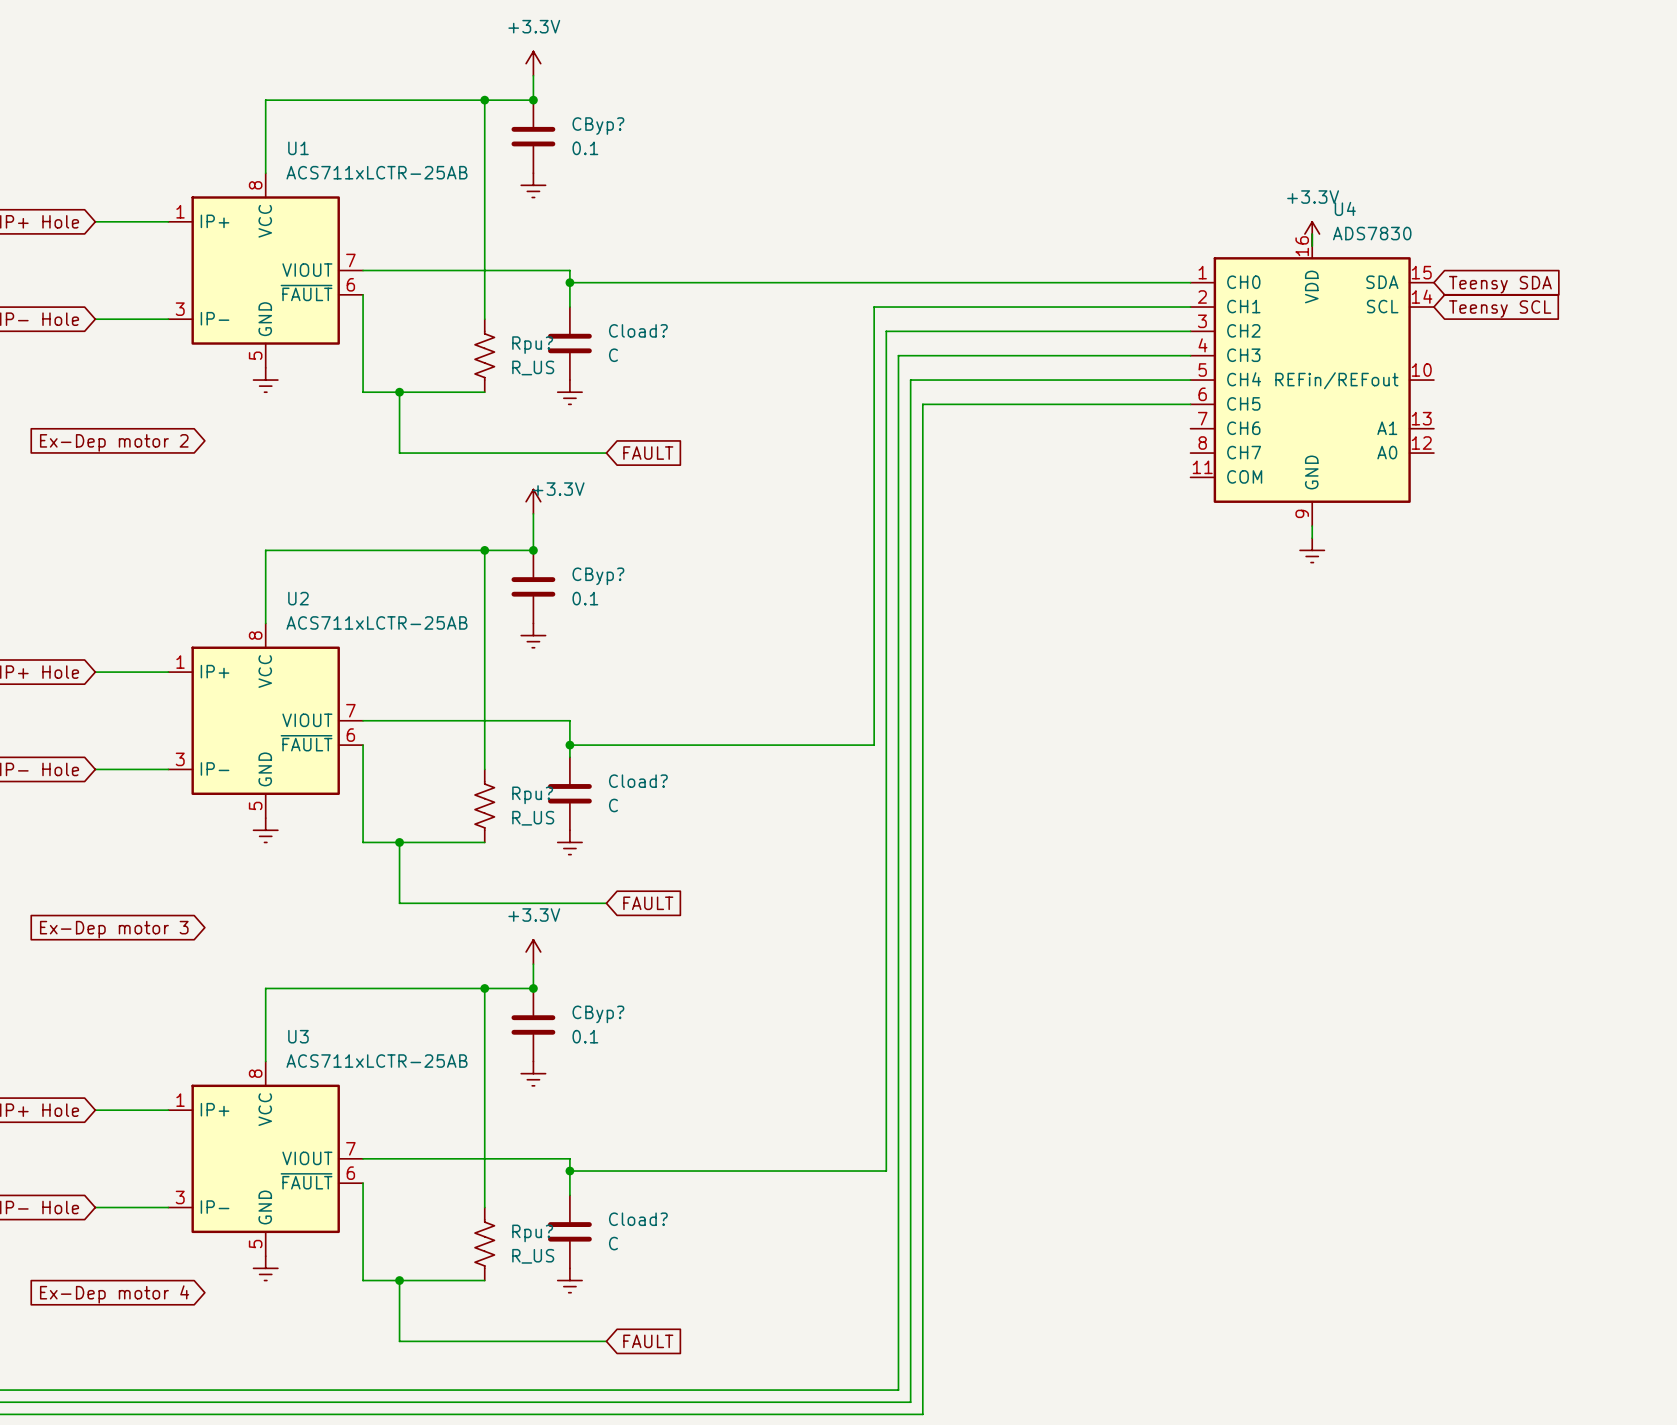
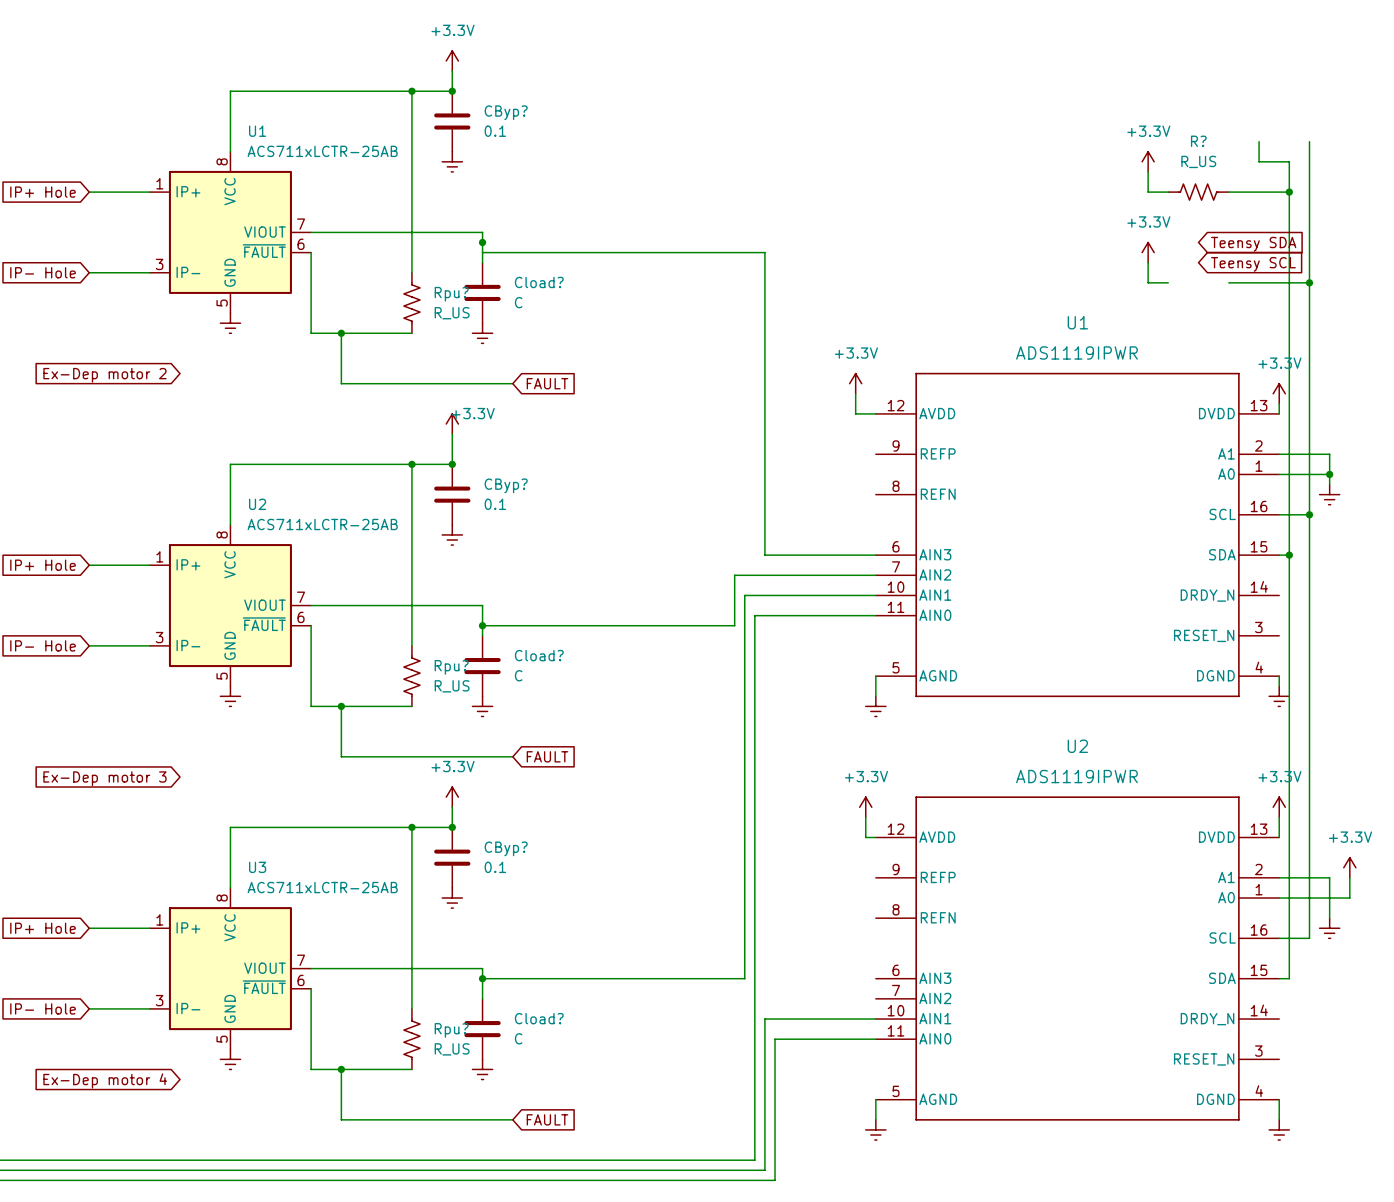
wire: none -> (1259, 141) (1259, 161) (1289, 161) (1289, 978) (1279, 978)
wire: none -> (1309, 141) (1309, 938) (1279, 938)
power symbol: none -> +3.3V (1148, 161)
wire: none -> (1148, 171) (1148, 192) (1168, 192)
R?: none -> R_US (1198, 192)
wire: none -> (1228, 192) (1289, 192)
junction: none -> (1289, 192)
wire: (1312, 234) (1312, 246) -> none
power symbol: +3.3V (1312, 234) -> none
wire: (569, 282) (1190, 282) -> none
power symbol: none -> +3.3V (1148, 252)
wire: (1190, 307) (874, 307) (874, 684) -> (875, 575) (734, 575)
wire: (1190, 331) (886, 331) (886, 708) -> (875, 595) (744, 595)
wire: none -> (1228, 282) (1309, 282)
junction: none -> (1309, 282)
wire: (1190, 355) (898, 355) (898, 732) -> (875, 615) (754, 615)
wire: (910, 380) (1190, 380) -> (764, 323) (764, 252) (482, 252)
U4: ADS7830 (1312, 380) -> none
wire: (1190, 404) (922, 404) (922, 1244) -> (875, 1039) (775, 1039)
power symbol: none -> +3.3V (855, 383)
wire: none -> (855, 393) (855, 413) (875, 413)
power symbol: none -> +3.3V (1279, 393)
wire: (1312, 526) (1312, 538) -> (1279, 403) (1279, 413)
wire: none -> (1279, 454) (1329, 454) (1329, 484)
power symbol: (1312, 550) -> none
wire: none -> (1279, 474) (1329, 474)
junction: none -> (1329, 474)
power symbol: none -> (1329, 494)
wire: none -> (1279, 514) (1309, 514)
junction: none -> (1309, 514)
U1: none -> ADS1119IPWR (1077, 534)
wire: (910, 659) (910, 1219) -> (764, 555) (875, 555)
wire: none -> (1279, 555) (1289, 555)
junction: none -> (1289, 555)
wire: none -> (875, 676) (875, 696)
wire: none -> (1279, 676) (1279, 686)
power symbol: none -> (1279, 696)
power symbol: none -> (875, 706)
power symbol: none -> +3.3V (865, 807)
power symbol: none -> +3.3V (1279, 807)
wire: none -> (865, 817) (865, 837) (875, 837)
wire: none -> (1279, 817) (1279, 837)
power symbol: none -> +3.3V (1349, 867)
wire: none -> (1279, 877) (1329, 877) (1329, 918)
wire: none -> (1349, 877) (1349, 898) (1279, 898)
power symbol: none -> (1329, 928)
U2: none -> ADS1119IPWR (1077, 958)
wire: none -> (764, 1019) (875, 1019)
wire: none -> (875, 1099) (875, 1119)
wire: none -> (1279, 1099) (1279, 1119)
power symbol: none -> (875, 1129)
power symbol: none -> (1279, 1129)

